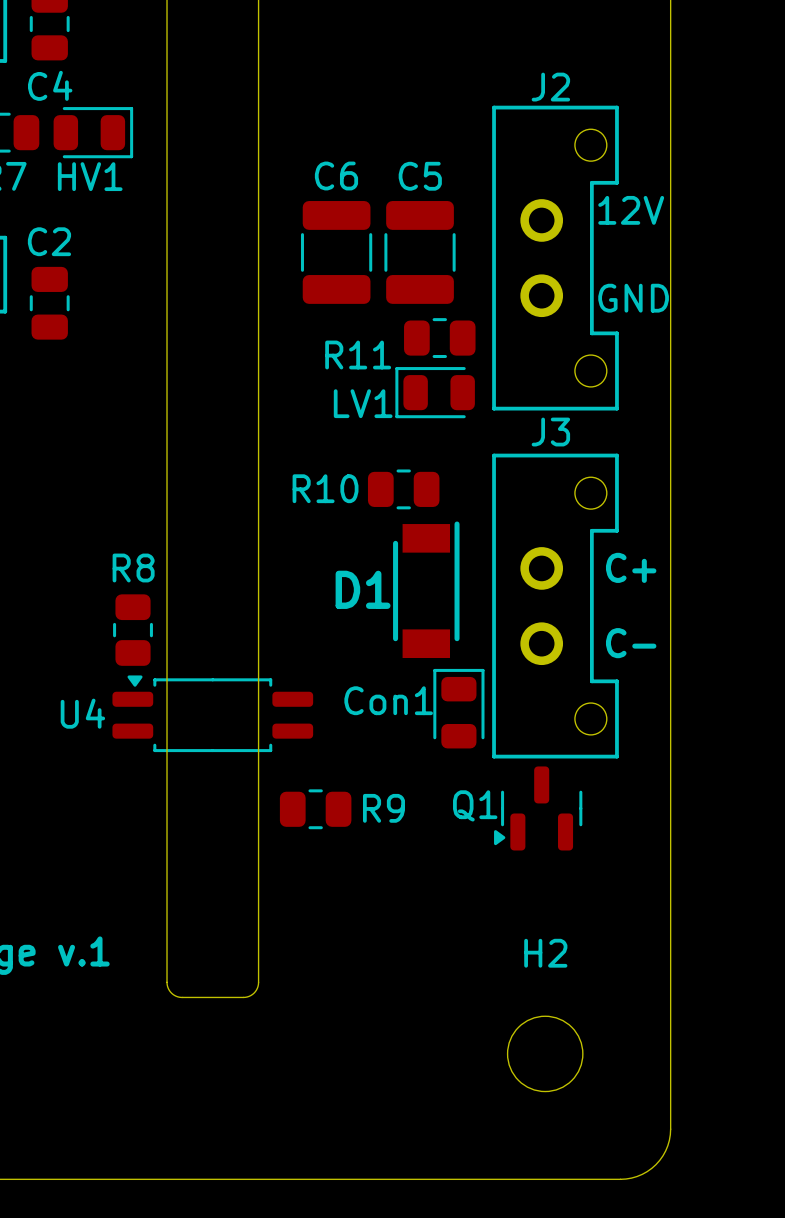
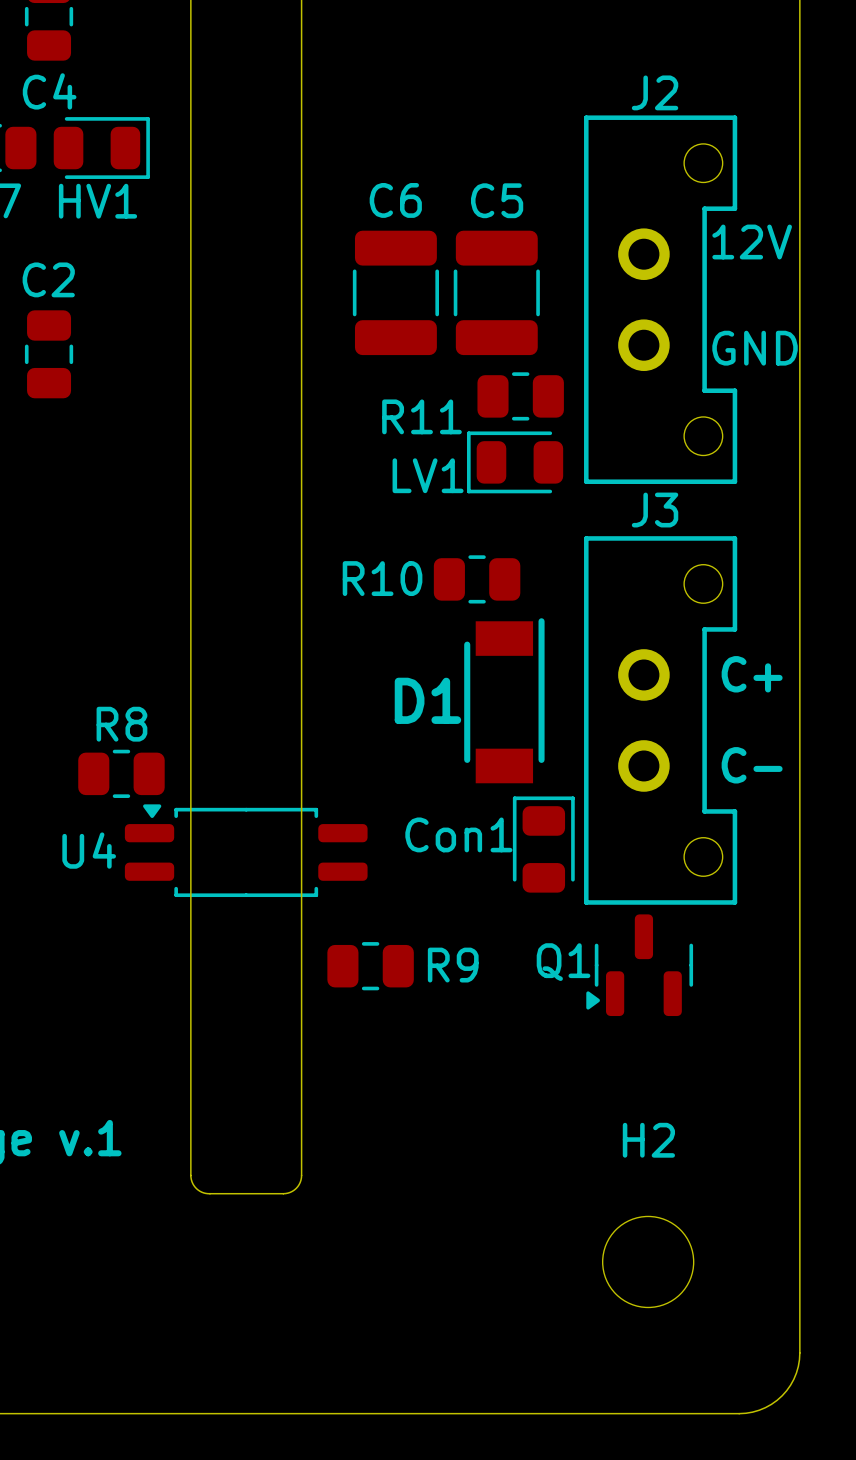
R8 rotation: 0° (133, 630) -> 90° clockwise (121, 773)

